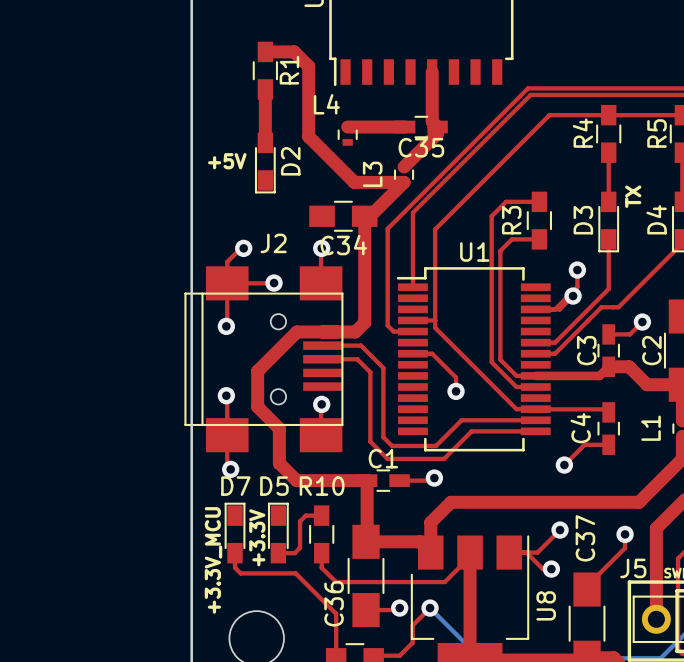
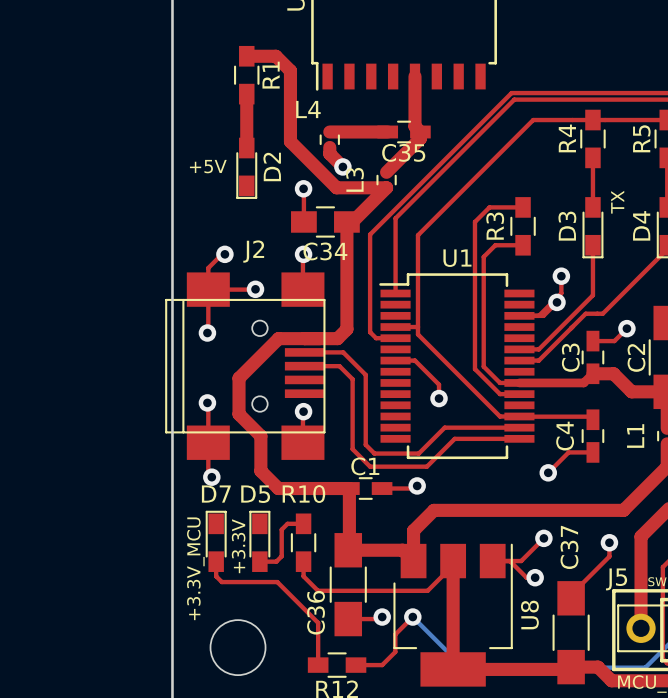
top track: none -> (329, 147) (329, 153) (342, 166)
via: none -> (342, 166)
top track: none -> (303, 188) (303, 221)
via: none -> (303, 188)

